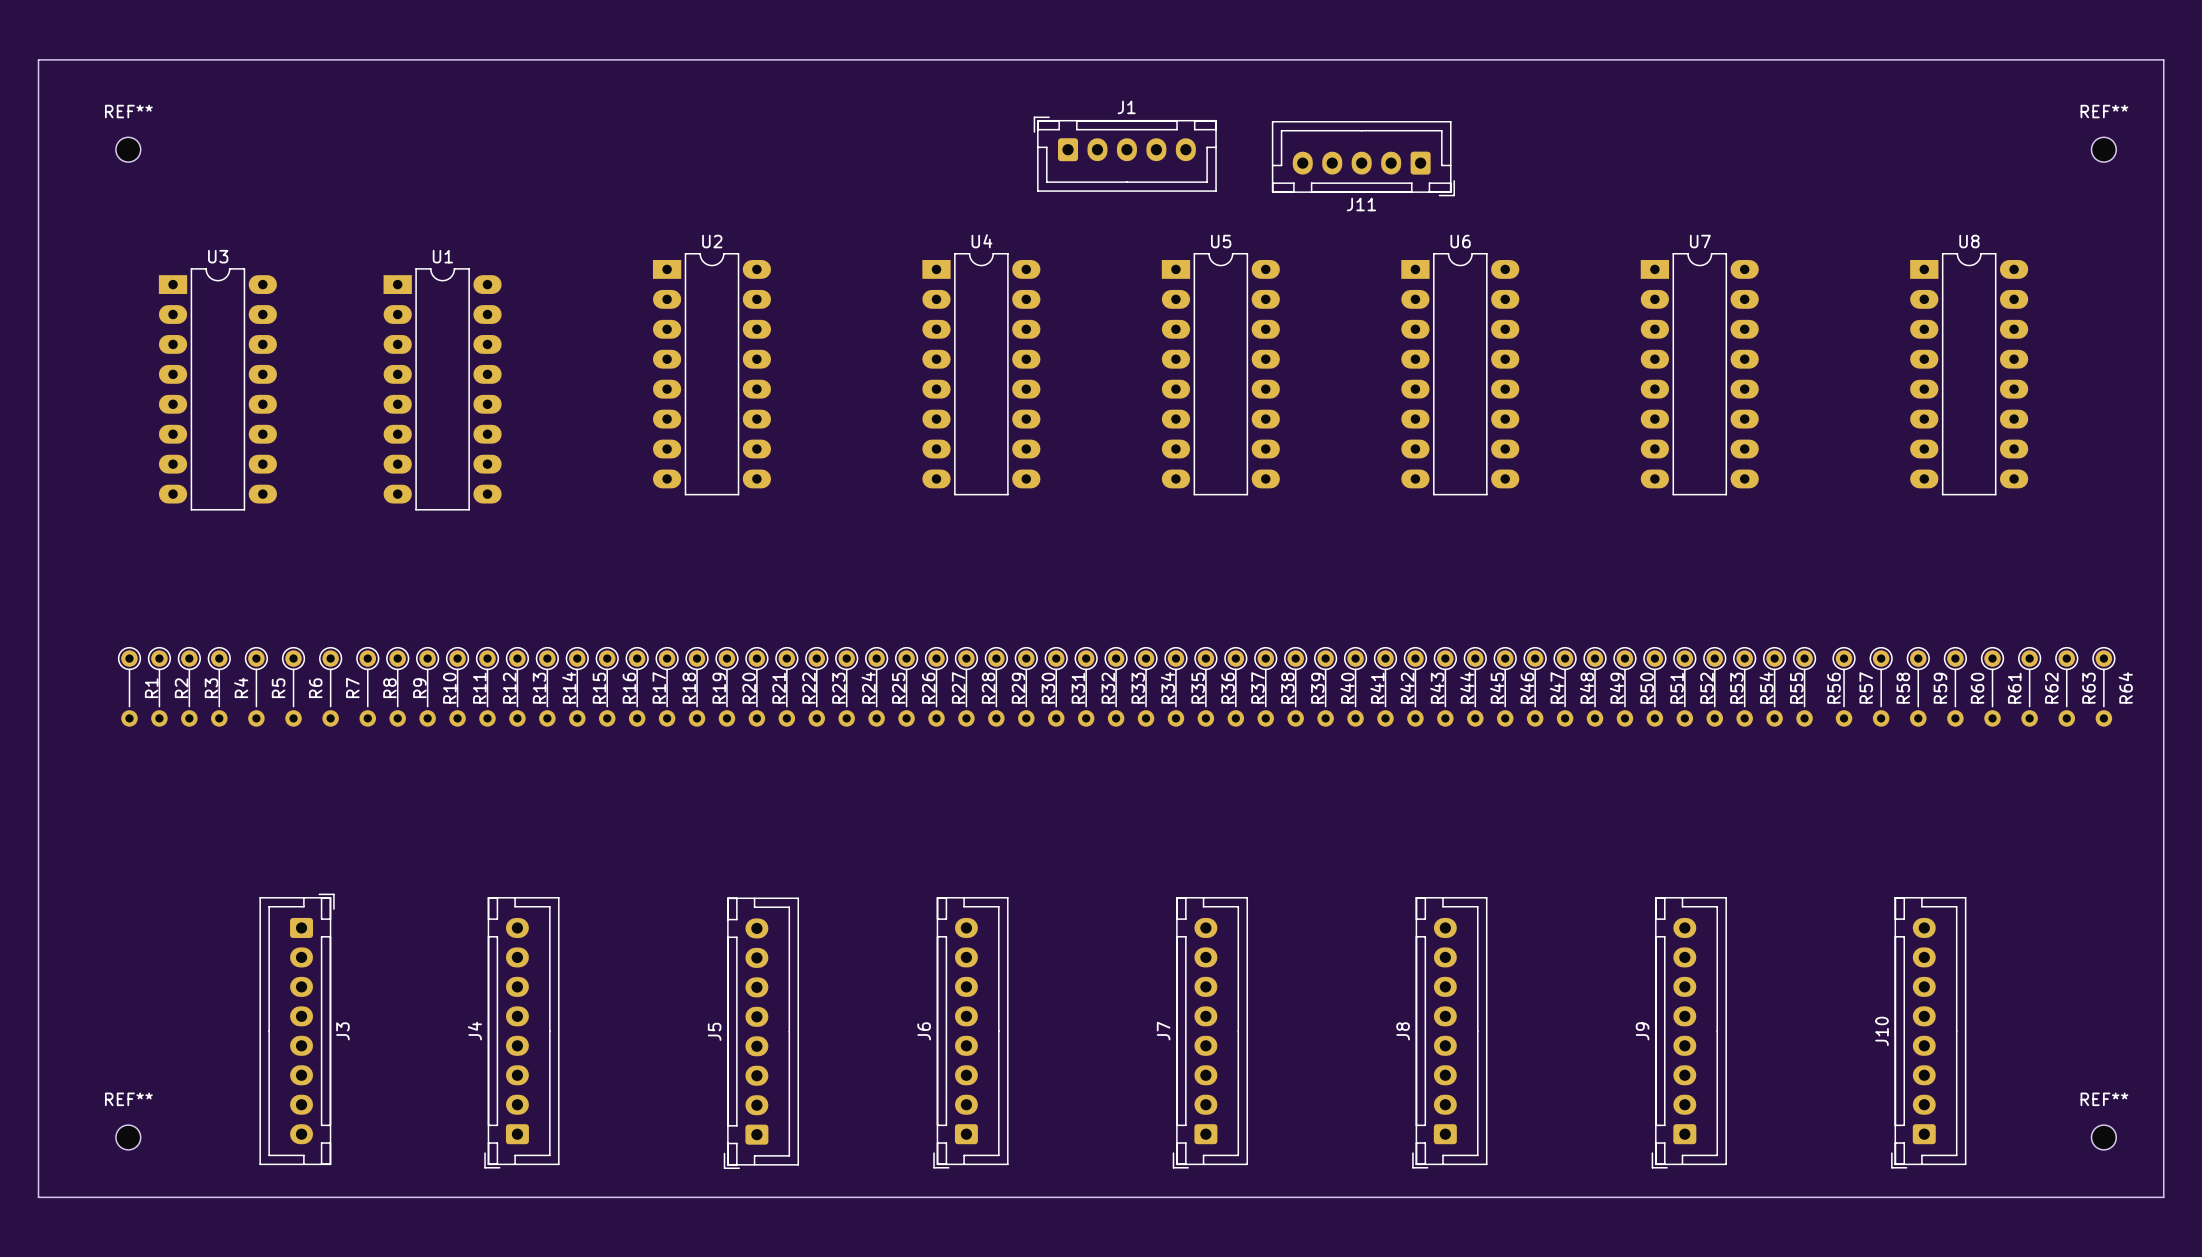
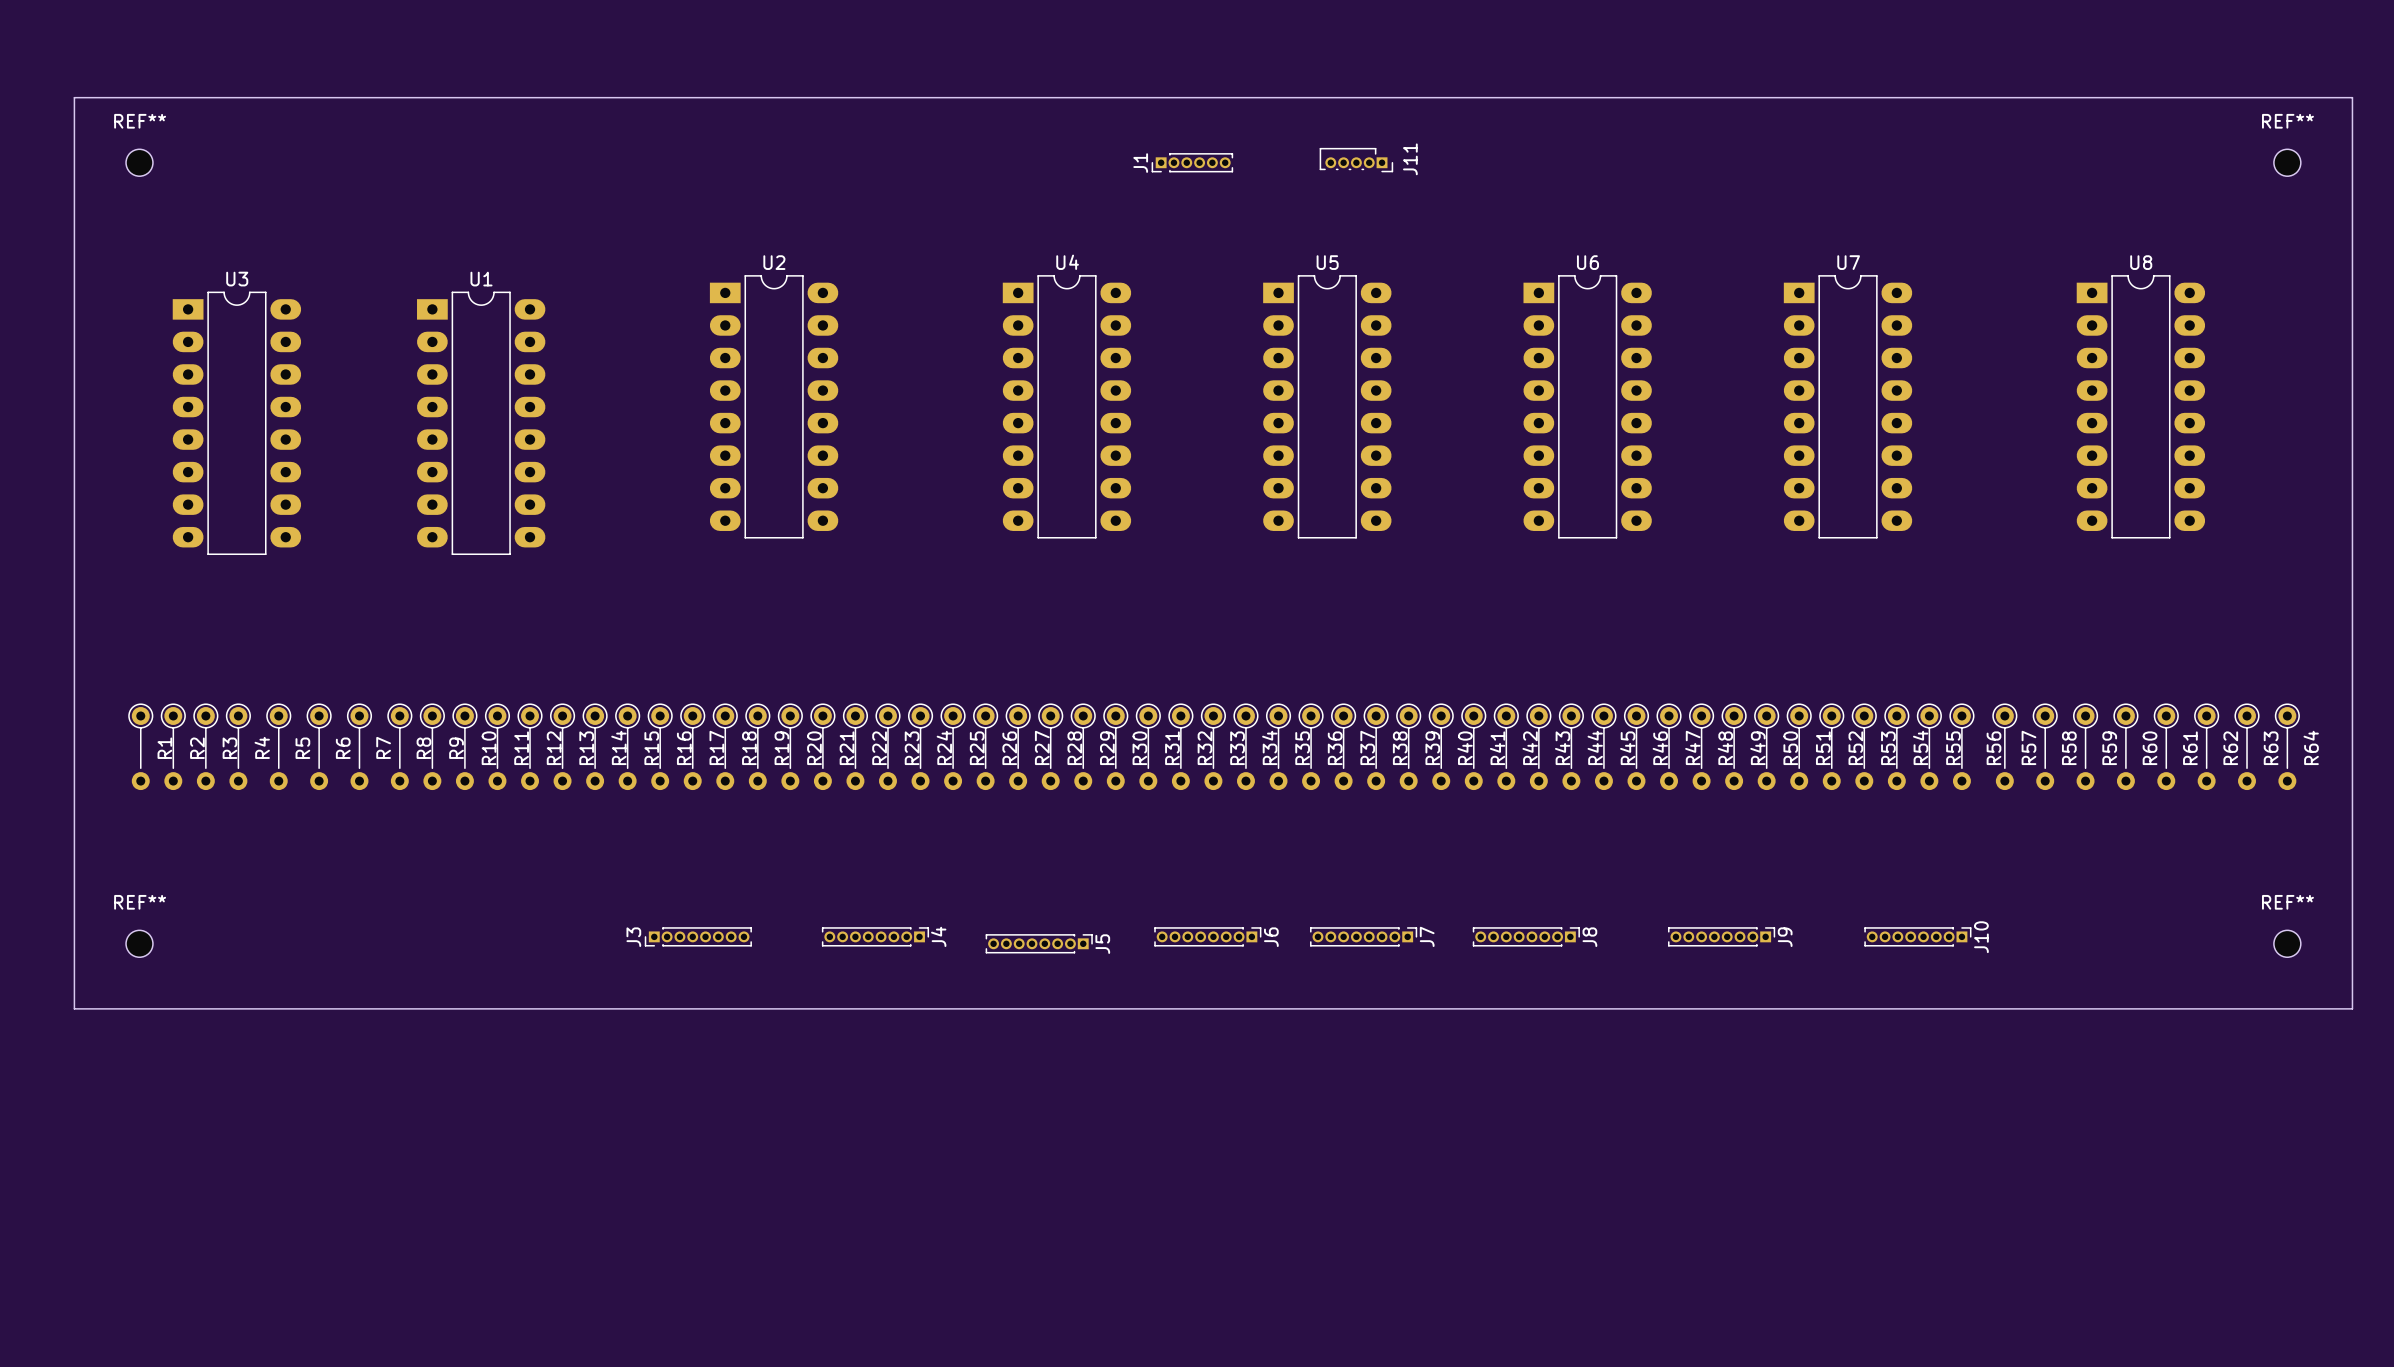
board edge: (2163, 89) (2163, 59) (38, 59) (38, 1197) (2163, 1197) (2163, 927) -> (2352, 97) (74, 97) (74, 1008) (2352, 1008)
J1 name position: J1 (1126, 107) -> J1 (1140, 163)
J1 footprint: [1033, 116, 1217, 192] -> [1151, 153, 1234, 173]
J11 footprint: [1271, 121, 1455, 197] -> [1319, 147, 1394, 173]
J11 name position: J11 (1361, 204) -> J11 (1410, 159)
J3 footprint: [259, 893, 335, 1166] -> [644, 927, 752, 947]
J4 footprint: [484, 897, 560, 1169] -> [821, 927, 930, 947]
J5 footprint: [723, 897, 799, 1169] -> [985, 934, 1093, 954]
J6 footprint: [933, 897, 1009, 1169] -> [1154, 927, 1262, 947]
J7 footprint: [1172, 897, 1248, 1169] -> [1310, 927, 1418, 947]
J8 footprint: [1412, 897, 1488, 1169] -> [1472, 927, 1580, 947]
J9 footprint: [1651, 897, 1727, 1169] -> [1668, 927, 1776, 947]
J10 footprint: [1891, 897, 1967, 1169] -> [1864, 927, 1972, 947]
J3 name position: J3 (342, 1031) -> J3 (633, 937)
J4 name position: J4 (474, 1031) -> J4 (938, 936)
J5 name position: J5 (714, 1031) -> J5 (1102, 944)
J6 name position: J6 (924, 1031) -> J6 (1271, 937)
J7 name position: J7 (1163, 1031) -> J7 (1427, 936)
J8 name position: J8 (1403, 1031) -> J8 (1589, 937)
J9 name position: J9 (1642, 1031) -> J9 (1785, 937)
J10 name position: J10 (1882, 1031) -> J10 (1981, 937)
REF** position: (128, 1137) -> (139, 943)
REF** position: (2103, 1137) -> (2287, 943)

